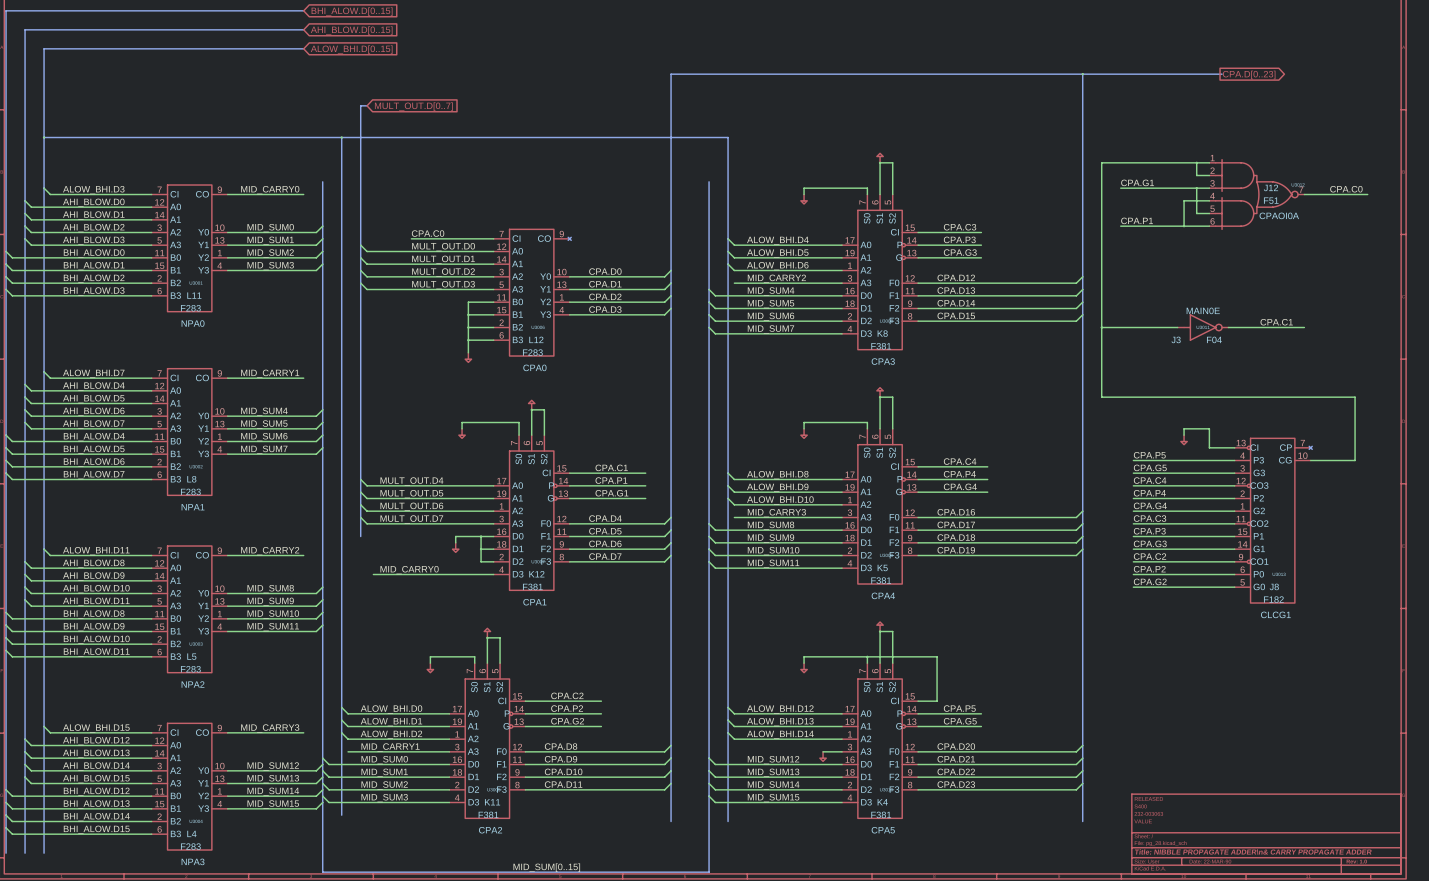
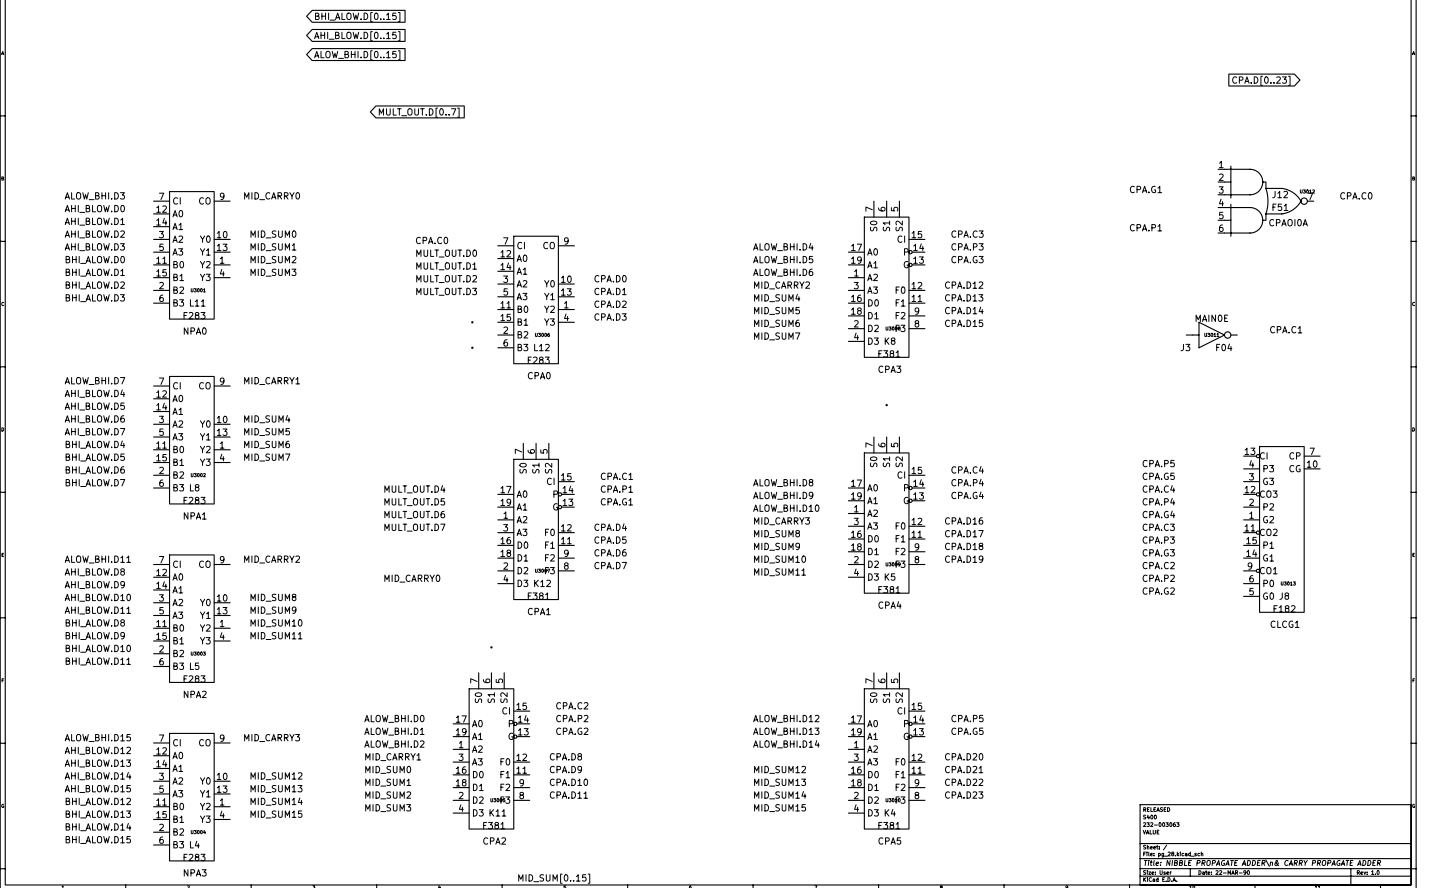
bus: (303, 10) (6, 10) (6, 853) -> none
bus: (303, 29) (25, 29) (25, 853) -> none
bus: (303, 48) (44, 48) (44, 853) -> none
bus: (1082, 74) (1082, 821) -> none
junction: (1082, 74) -> none
bus: (1222, 74) (671, 74) (671, 821) -> none
bus: (367, 105) (360, 105) (360, 536) -> none
bus: (44, 137) (728, 137) (728, 821) -> none
junction: (44, 137) -> none
bus: (341, 137) (341, 815) -> none
junction: (341, 137) -> none
power symbol: (880, 157) -> none
wire: (1196, 162) (1196, 175) (1209, 175) -> none
wire: (1209, 162) (1101, 162) (1101, 397) (1355, 397) (1355, 460) (1310, 460) -> none
bus: (322, 181) (322, 872) (709, 872) (709, 181) -> none
wire: (44, 188) (50, 194) (151, 194) -> none
wire: (1120, 188) (1209, 188) -> none
wire: (1196, 188) (1196, 213) (1209, 213) -> none
wire: (227, 194) (303, 194) -> none
wire: (804, 194) (804, 188) (867, 188) (867, 194) -> none
wire: (880, 194) (880, 162) (892, 162) (892, 194) -> none
wire: (1304, 194) (1367, 194) -> none
power symbol: (804, 199) -> none
wire: (25, 200) (31, 207) (151, 207) -> none
wire: (1209, 200) (1184, 200) (1184, 226) -> none
wire: (25, 213) (31, 219) (151, 219) -> none
wire: (25, 226) (31, 232) (151, 232) -> none
wire: (322, 226) (316, 232) (227, 232) -> none
wire: (1120, 226) (1209, 226) -> none
wire: (918, 232) (981, 232) -> none
wire: (25, 238) (31, 245) (151, 245) -> none
wire: (322, 238) (316, 245) (227, 245) -> none
wire: (411, 238) (493, 238) -> none
no-connect mark: (569, 238) -> none
wire: (728, 238) (734, 245) (842, 245) -> none
wire: (360, 245) (367, 251) (493, 251) -> none
wire: (918, 245) (981, 245) -> none
wire: (6, 251) (12, 257) (151, 257) -> none
wire: (322, 251) (316, 257) (227, 257) -> none
wire: (728, 251) (734, 257) (842, 257) -> none
wire: (360, 257) (367, 264) (493, 264) -> none
wire: (918, 257) (981, 257) -> none
wire: (6, 264) (12, 270) (151, 270) -> none
wire: (322, 264) (316, 270) (227, 270) -> none
wire: (728, 264) (734, 270) (842, 270) -> none
wire: (360, 270) (367, 276) (493, 276) -> none
wire: (671, 270) (664, 276) (569, 276) -> none
wire: (6, 276) (12, 283) (151, 283) -> none
wire: (1082, 276) (1076, 283) (918, 283) -> none
wire: (360, 283) (367, 289) (493, 289) -> none
wire: (671, 283) (664, 289) (569, 289) -> none
wire: (734, 283) (842, 283) -> none
wire: (6, 289) (12, 295) (151, 295) -> none
wire: (709, 289) (715, 295) (842, 295) -> none
wire: (1082, 289) (1076, 295) (918, 295) -> none
wire: (671, 295) (664, 302) (569, 302) -> none
wire: (493, 302) (468, 302) (468, 352) -> none
wire: (709, 302) (715, 308) (842, 308) -> none
wire: (1082, 302) (1076, 308) (918, 308) -> none
wire: (671, 308) (664, 314) (569, 314) -> none
wire: (468, 314) (493, 314) -> none
wire: (709, 314) (715, 321) (842, 321) -> none
wire: (1082, 314) (1076, 321) (918, 321) -> none
wire: (468, 327) (493, 327) -> none
wire: (709, 327) (715, 333) (842, 333) -> none
wire: (1101, 327) (1177, 327) -> none
wire: (1228, 327) (1304, 327) -> none
wire: (468, 340) (493, 340) -> none
power symbol: (468, 357) -> none
wire: (44, 371) (50, 378) (151, 378) -> none
wire: (227, 378) (303, 378) -> none
wire: (25, 384) (31, 390) (151, 390) -> none
power symbol: (880, 392) -> none
wire: (25, 397) (31, 403) (151, 403) -> none
power symbol: (531, 404) -> none
wire: (25, 409) (31, 416) (151, 416) -> none
wire: (322, 409) (316, 416) (227, 416) -> none
wire: (25, 422) (31, 428) (151, 428) -> none
wire: (322, 422) (316, 428) (227, 428) -> none
wire: (462, 428) (462, 422) (519, 422) (519, 435) -> none
wire: (804, 428) (804, 422) (867, 422) (867, 428) -> none
wire: (880, 428) (880, 397) (892, 397) (892, 428) -> none
power symbol: (462, 433) -> none
power symbol: (804, 433) -> none
wire: (6, 435) (12, 441) (151, 441) -> none
wire: (322, 435) (316, 441) (227, 441) -> none
wire: (531, 435) (531, 409) (544, 409) (544, 435) -> none
wire: (1184, 435) (1184, 428) (1209, 428) (1209, 447) (1234, 447) -> none
power symbol: (1184, 440) -> none
wire: (6, 447) (12, 454) (151, 454) -> none
wire: (322, 447) (316, 454) (227, 454) -> none
no-connect mark: (1310, 447) -> none
wire: (6, 460) (12, 466) (151, 466) -> none
wire: (1133, 460) (1234, 460) -> none
wire: (918, 466) (987, 466) -> none
wire: (6, 473) (12, 479) (151, 479) -> none
wire: (569, 473) (645, 473) -> none
wire: (728, 473) (734, 479) (842, 479) -> none
wire: (1133, 473) (1234, 473) -> none
wire: (360, 479) (367, 485) (493, 485) -> none
wire: (918, 479) (987, 479) -> none
wire: (569, 485) (645, 485) -> none
wire: (728, 485) (734, 492) (842, 492) -> none
wire: (1133, 485) (1234, 485) -> none
wire: (360, 492) (367, 498) (493, 498) -> none
wire: (918, 492) (987, 492) -> none
wire: (569, 498) (645, 498) -> none
wire: (728, 498) (734, 504) (842, 504) -> none
wire: (1133, 498) (1234, 498) -> none
wire: (360, 504) (367, 511) (493, 511) -> none
wire: (1082, 511) (1076, 517) (918, 517) -> none
wire: (1133, 511) (1234, 511) -> none
wire: (360, 517) (367, 523) (493, 523) -> none
wire: (671, 517) (664, 523) (569, 523) -> none
wire: (734, 517) (842, 517) -> none
wire: (709, 523) (715, 530) (842, 530) -> none
wire: (1082, 523) (1076, 530) (918, 530) -> none
wire: (1133, 523) (1234, 523) -> none
wire: (671, 530) (664, 536) (569, 536) -> none
wire: (481, 536) (481, 561) (493, 561) -> none
wire: (493, 536) (455, 536) (455, 542) -> none
wire: (709, 536) (715, 542) (842, 542) -> none
wire: (1082, 536) (1076, 542) (918, 542) -> none
wire: (1133, 536) (1234, 536) -> none
wire: (671, 542) (664, 549) (569, 549) -> none
power symbol: (455, 547) -> none
wire: (44, 549) (50, 555) (151, 555) -> none
wire: (481, 549) (493, 549) -> none
wire: (709, 549) (715, 555) (842, 555) -> none
wire: (1082, 549) (1076, 555) (918, 555) -> none
wire: (1133, 549) (1234, 549) -> none
wire: (227, 555) (303, 555) -> none
wire: (671, 555) (664, 561) (569, 561) -> none
wire: (25, 561) (31, 568) (151, 568) -> none
wire: (709, 561) (715, 568) (842, 568) -> none
wire: (1133, 561) (1234, 561) -> none
wire: (25, 574) (31, 580) (151, 580) -> none
wire: (373, 574) (493, 574) -> none
wire: (1133, 574) (1234, 574) -> none
wire: (25, 587) (31, 593) (151, 593) -> none
wire: (322, 587) (316, 593) (227, 593) -> none
wire: (1133, 587) (1234, 587) -> none
wire: (25, 599) (31, 606) (151, 606) -> none
wire: (322, 599) (316, 606) (227, 606) -> none
wire: (6, 612) (12, 618) (151, 618) -> none
wire: (322, 612) (316, 618) (227, 618) -> none
wire: (6, 625) (12, 631) (151, 631) -> none
wire: (322, 625) (316, 631) (227, 631) -> none
power symbol: (880, 626) -> none
power symbol: (487, 632) -> none
wire: (6, 637) (12, 644) (151, 644) -> none
wire: (6, 650) (12, 656) (151, 656) -> none
wire: (867, 656) (867, 663) -> none
wire: (430, 663) (430, 656) (474, 656) (474, 663) -> none
wire: (487, 663) (487, 637) (500, 637) (500, 663) -> none
wire: (804, 663) (804, 656) (937, 656) (937, 701) (918, 701) -> none
wire: (880, 663) (880, 631) (892, 631) (892, 663) -> none
power symbol: (430, 668) -> none
power symbol: (804, 668) -> none
wire: (525, 701) (601, 701) -> none
wire: (341, 707) (348, 713) (449, 713) -> none
wire: (728, 707) (734, 713) (842, 713) -> none
wire: (525, 713) (601, 713) -> none
wire: (918, 713) (981, 713) -> none
wire: (341, 720) (348, 726) (449, 726) -> none
wire: (728, 720) (734, 726) (842, 726) -> none
wire: (44, 726) (50, 732) (151, 732) -> none
wire: (525, 726) (601, 726) -> none
wire: (918, 726) (981, 726) -> none
wire: (227, 732) (303, 732) -> none
wire: (341, 732) (348, 739) (449, 739) -> none
wire: (728, 732) (734, 739) (842, 739) -> none
wire: (25, 739) (31, 745) (151, 745) -> none
wire: (671, 745) (664, 751) (525, 751) -> none
wire: (1082, 745) (1076, 751) (918, 751) -> none
wire: (25, 751) (31, 758) (151, 758) -> none
wire: (348, 751) (449, 751) -> none
wire: (823, 751) (842, 751) -> none
power symbol: (823, 756) -> none
wire: (322, 758) (329, 764) (449, 764) -> none
wire: (671, 758) (664, 764) (525, 764) -> none
wire: (709, 758) (715, 764) (842, 764) -> none
wire: (1082, 758) (1076, 764) (918, 764) -> none
wire: (25, 764) (31, 770) (151, 770) -> none
wire: (322, 764) (316, 770) (227, 770) -> none
wire: (322, 770) (329, 777) (449, 777) -> none
wire: (671, 770) (664, 777) (525, 777) -> none
wire: (709, 770) (715, 777) (842, 777) -> none
wire: (1082, 770) (1076, 777) (918, 777) -> none
wire: (25, 777) (31, 783) (151, 783) -> none
wire: (322, 777) (316, 783) (227, 783) -> none
wire: (322, 783) (329, 789) (449, 789) -> none
wire: (671, 783) (664, 789) (525, 789) -> none
wire: (709, 783) (715, 789) (842, 789) -> none
wire: (1082, 783) (1076, 789) (918, 789) -> none
wire: (6, 789) (12, 796) (151, 796) -> none
wire: (322, 789) (316, 796) (227, 796) -> none
wire: (322, 796) (329, 802) (449, 802) -> none
wire: (709, 796) (715, 802) (842, 802) -> none
wire: (6, 802) (12, 808) (151, 808) -> none
wire: (322, 802) (316, 808) (227, 808) -> none
wire: (6, 815) (12, 821) (151, 821) -> none
wire: (6, 827) (12, 834) (151, 834) -> none

